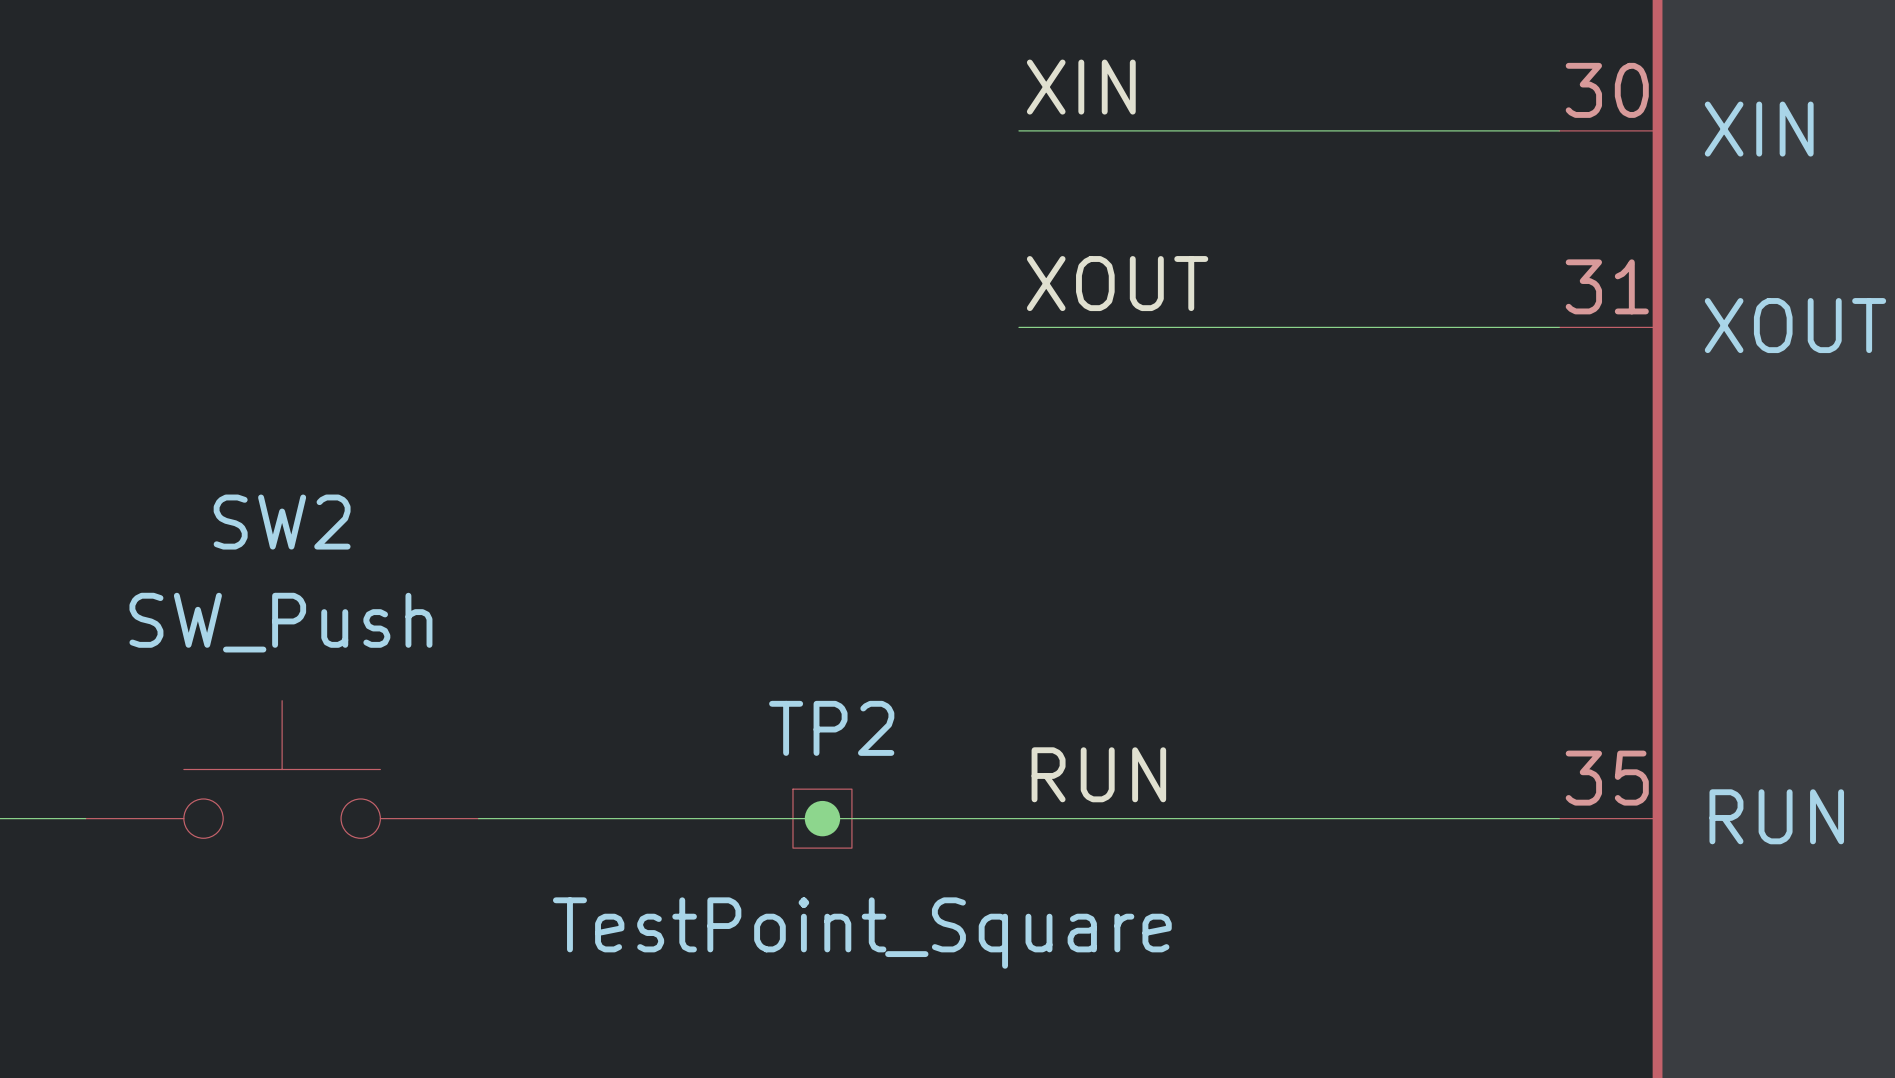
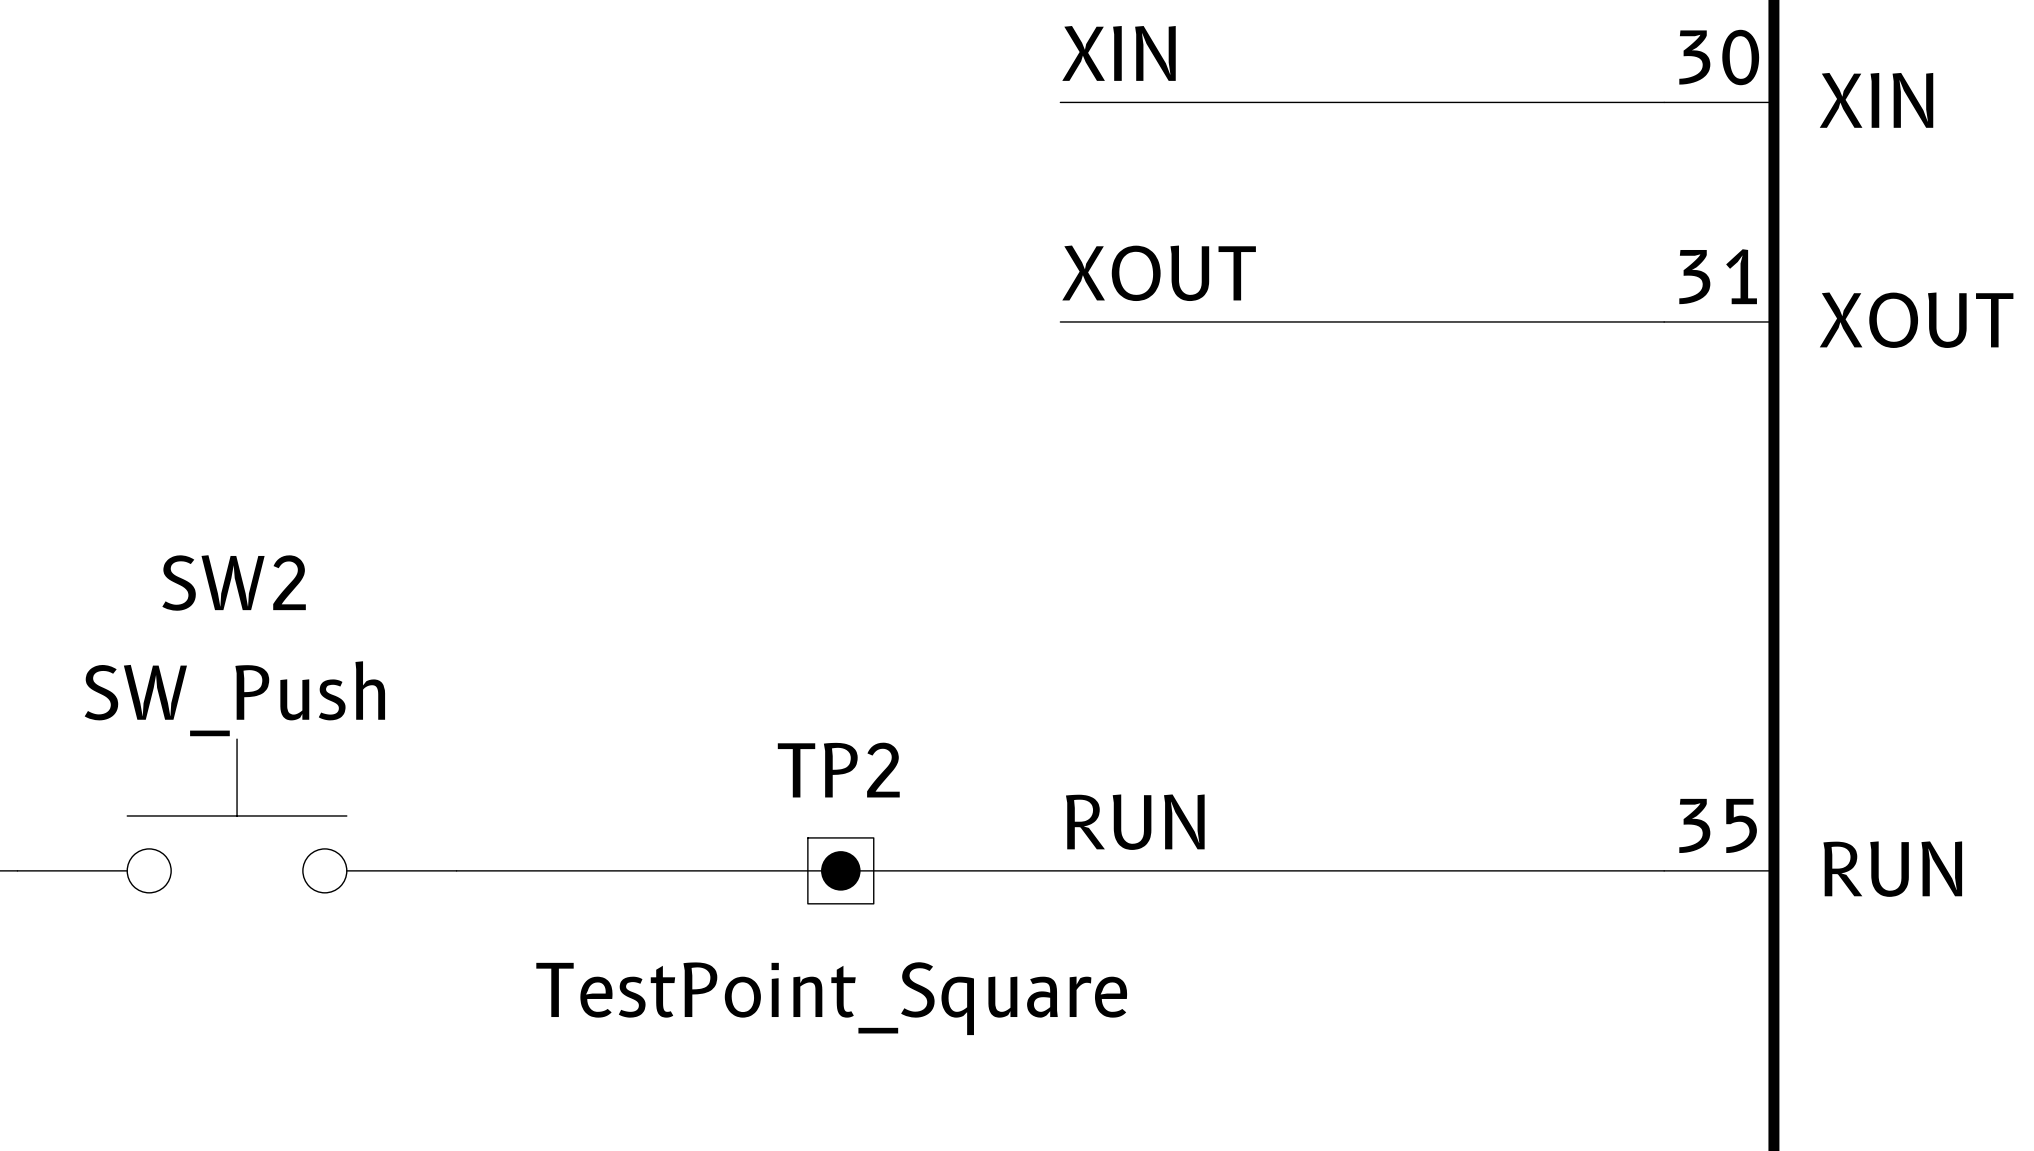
SW2 name position: SW2 (282, 522) -> SW2 (234, 582)
SW2 value position: SW_Push (280, 622) -> SW_Push (234, 698)

